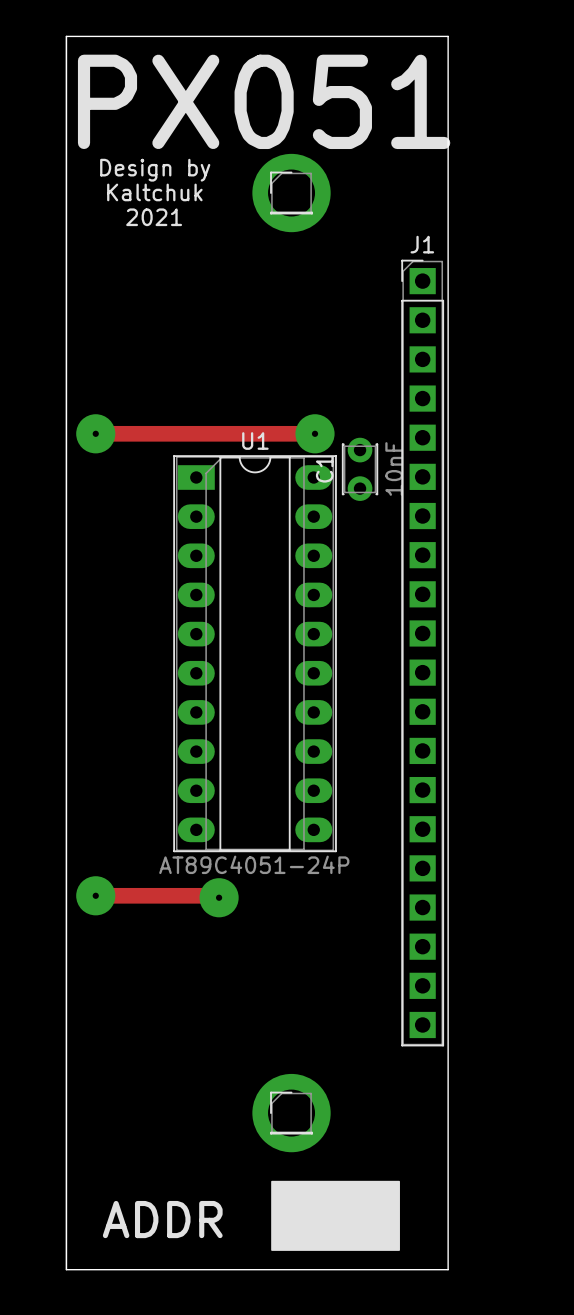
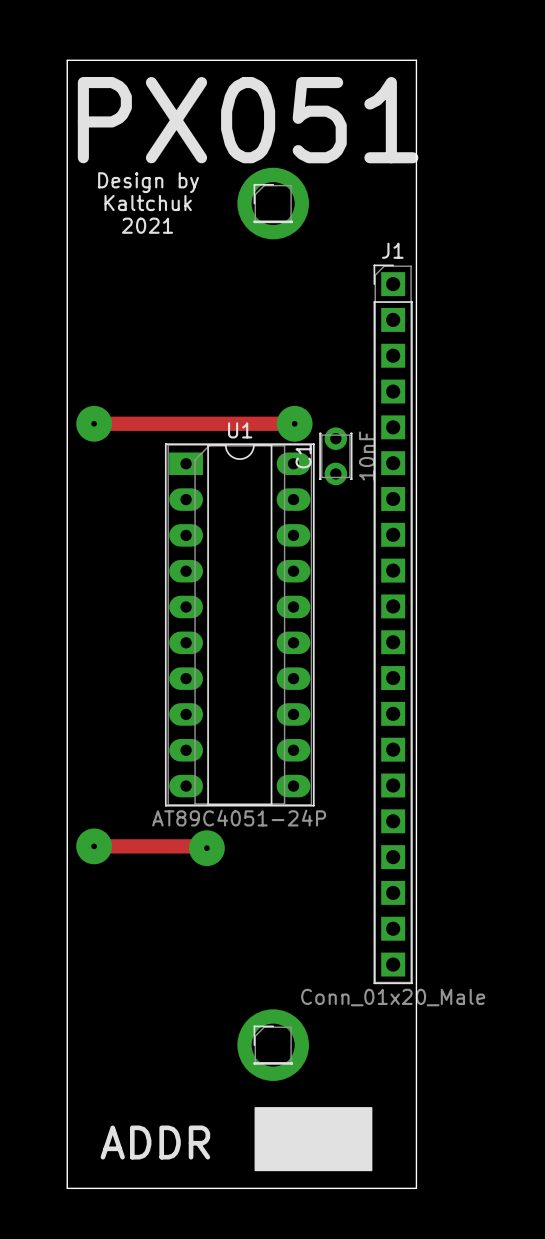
J1 value: none -> Conn_01x20_Male (393, 997)

